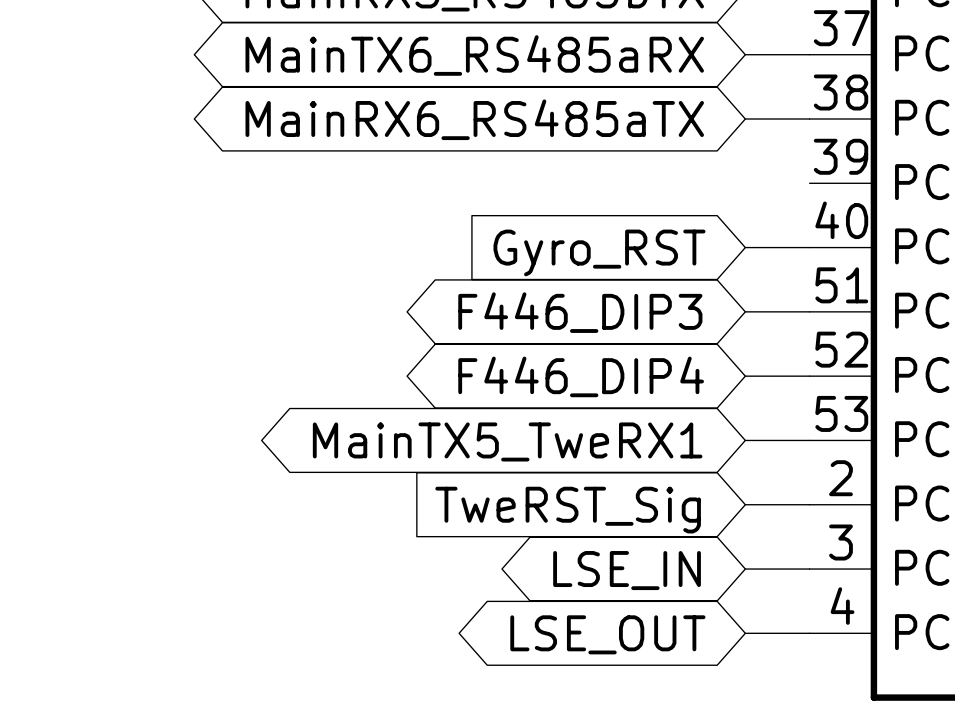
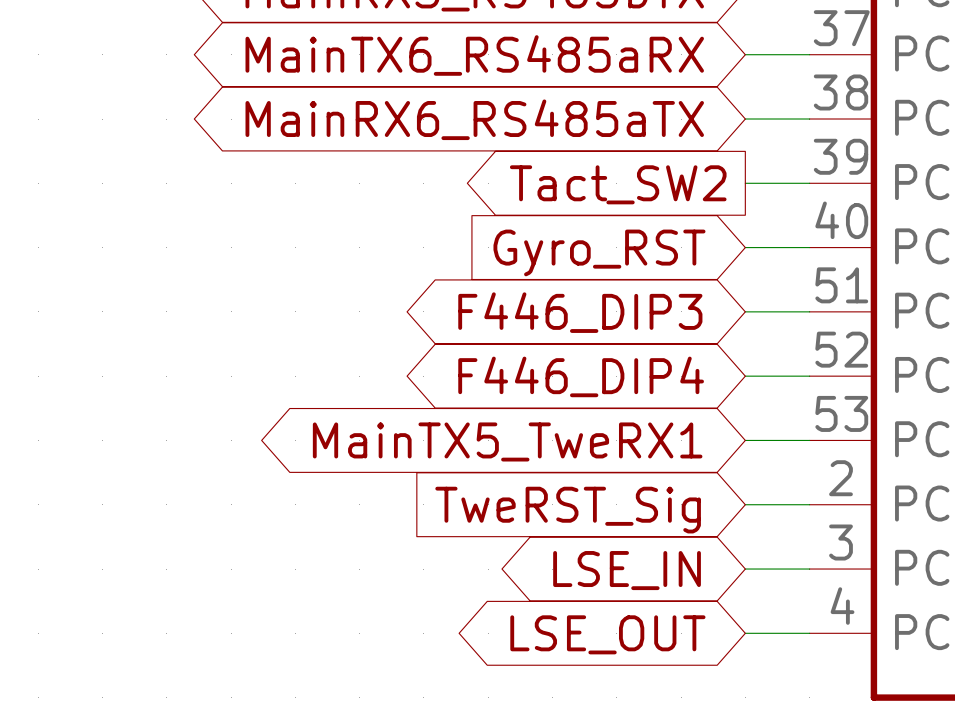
wire: none -> (745, 183) (809, 183)
global label: none -> Tact_SW2 (618, 184)

